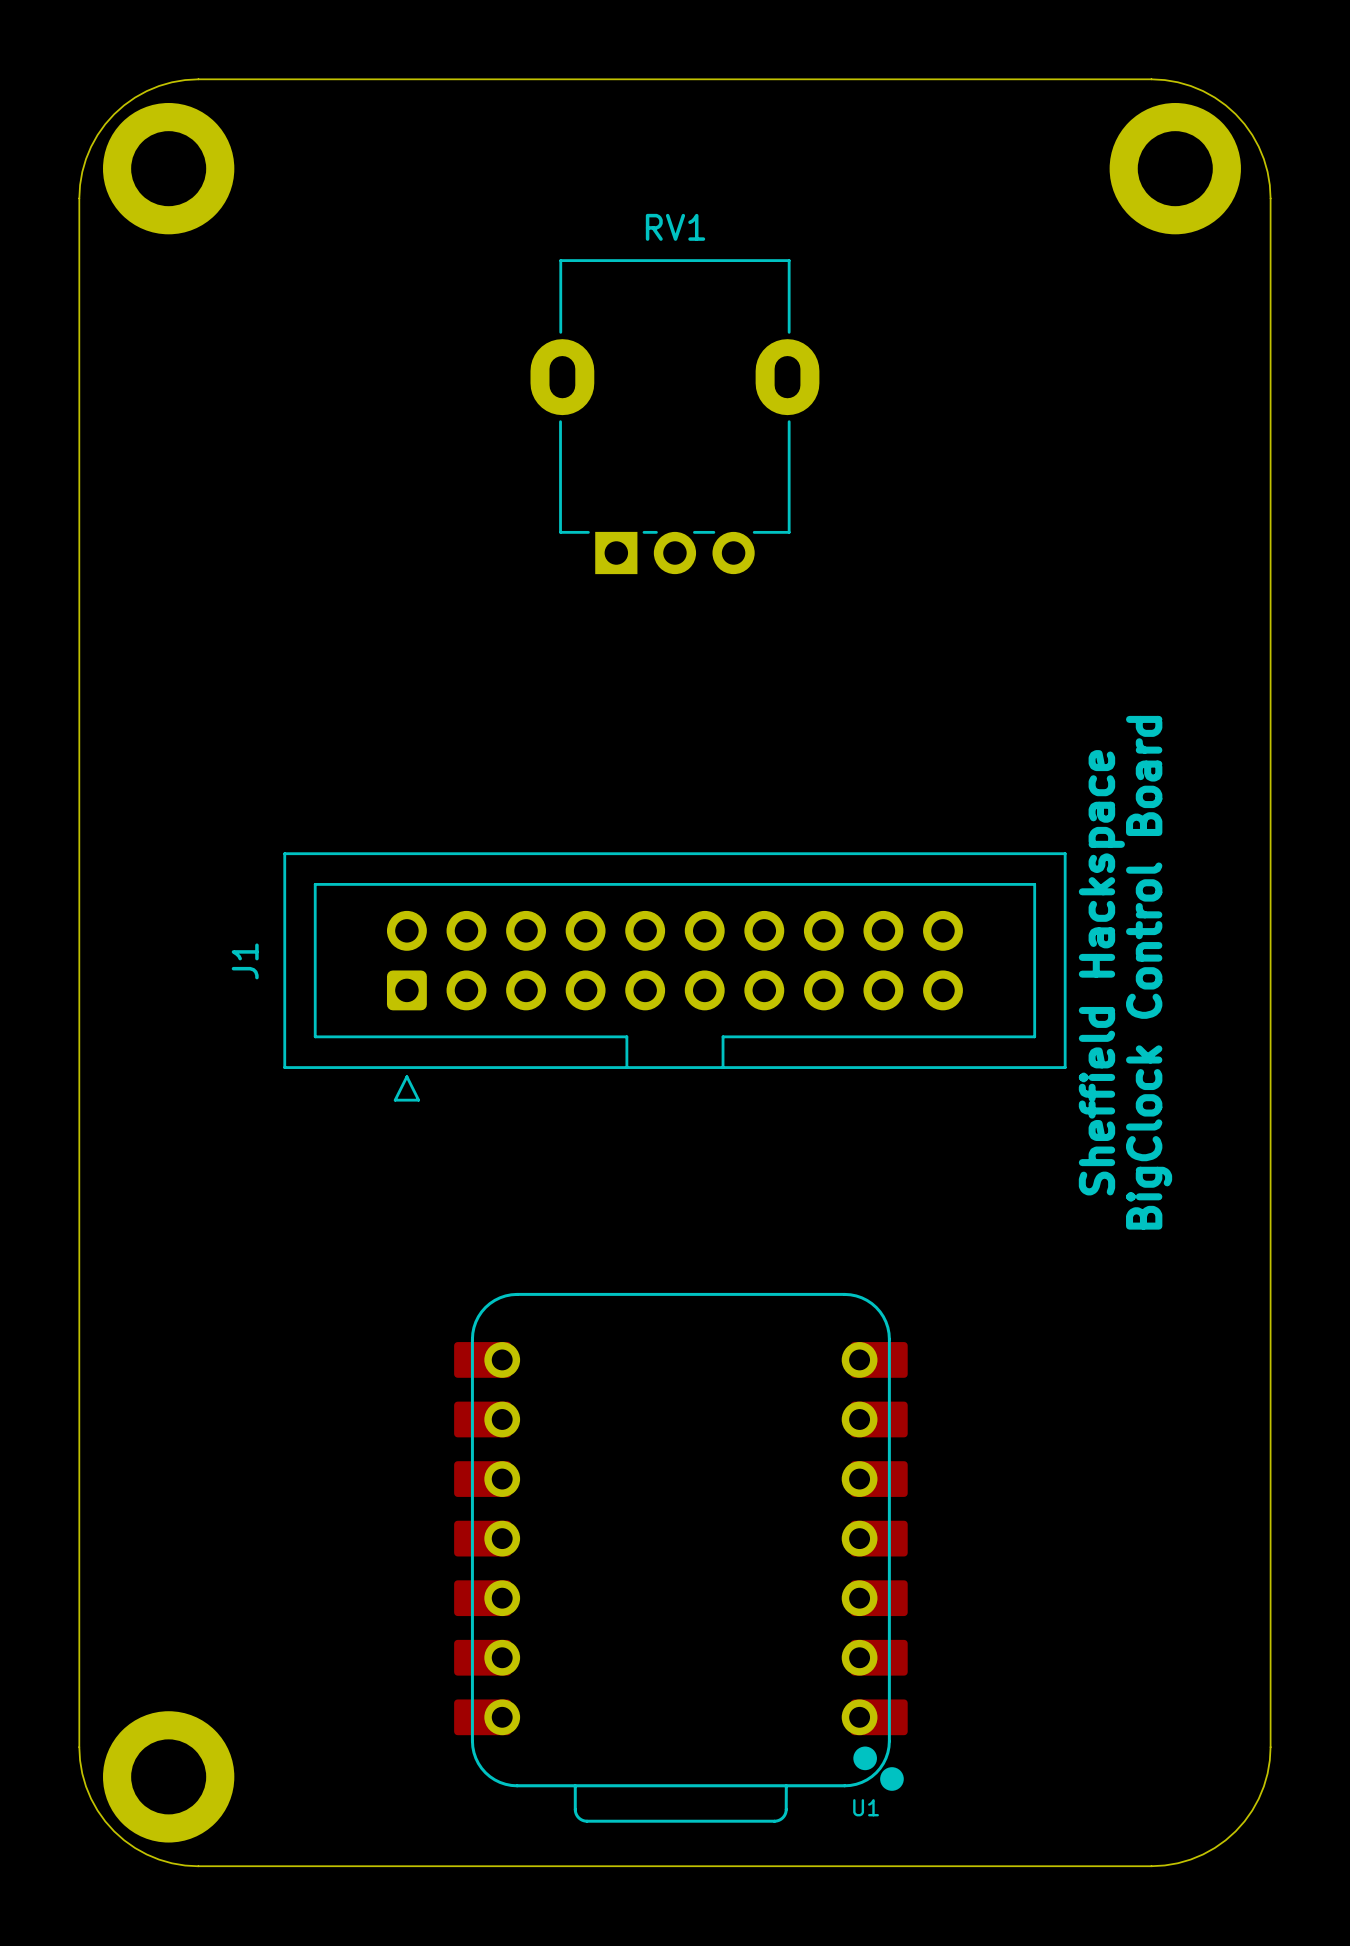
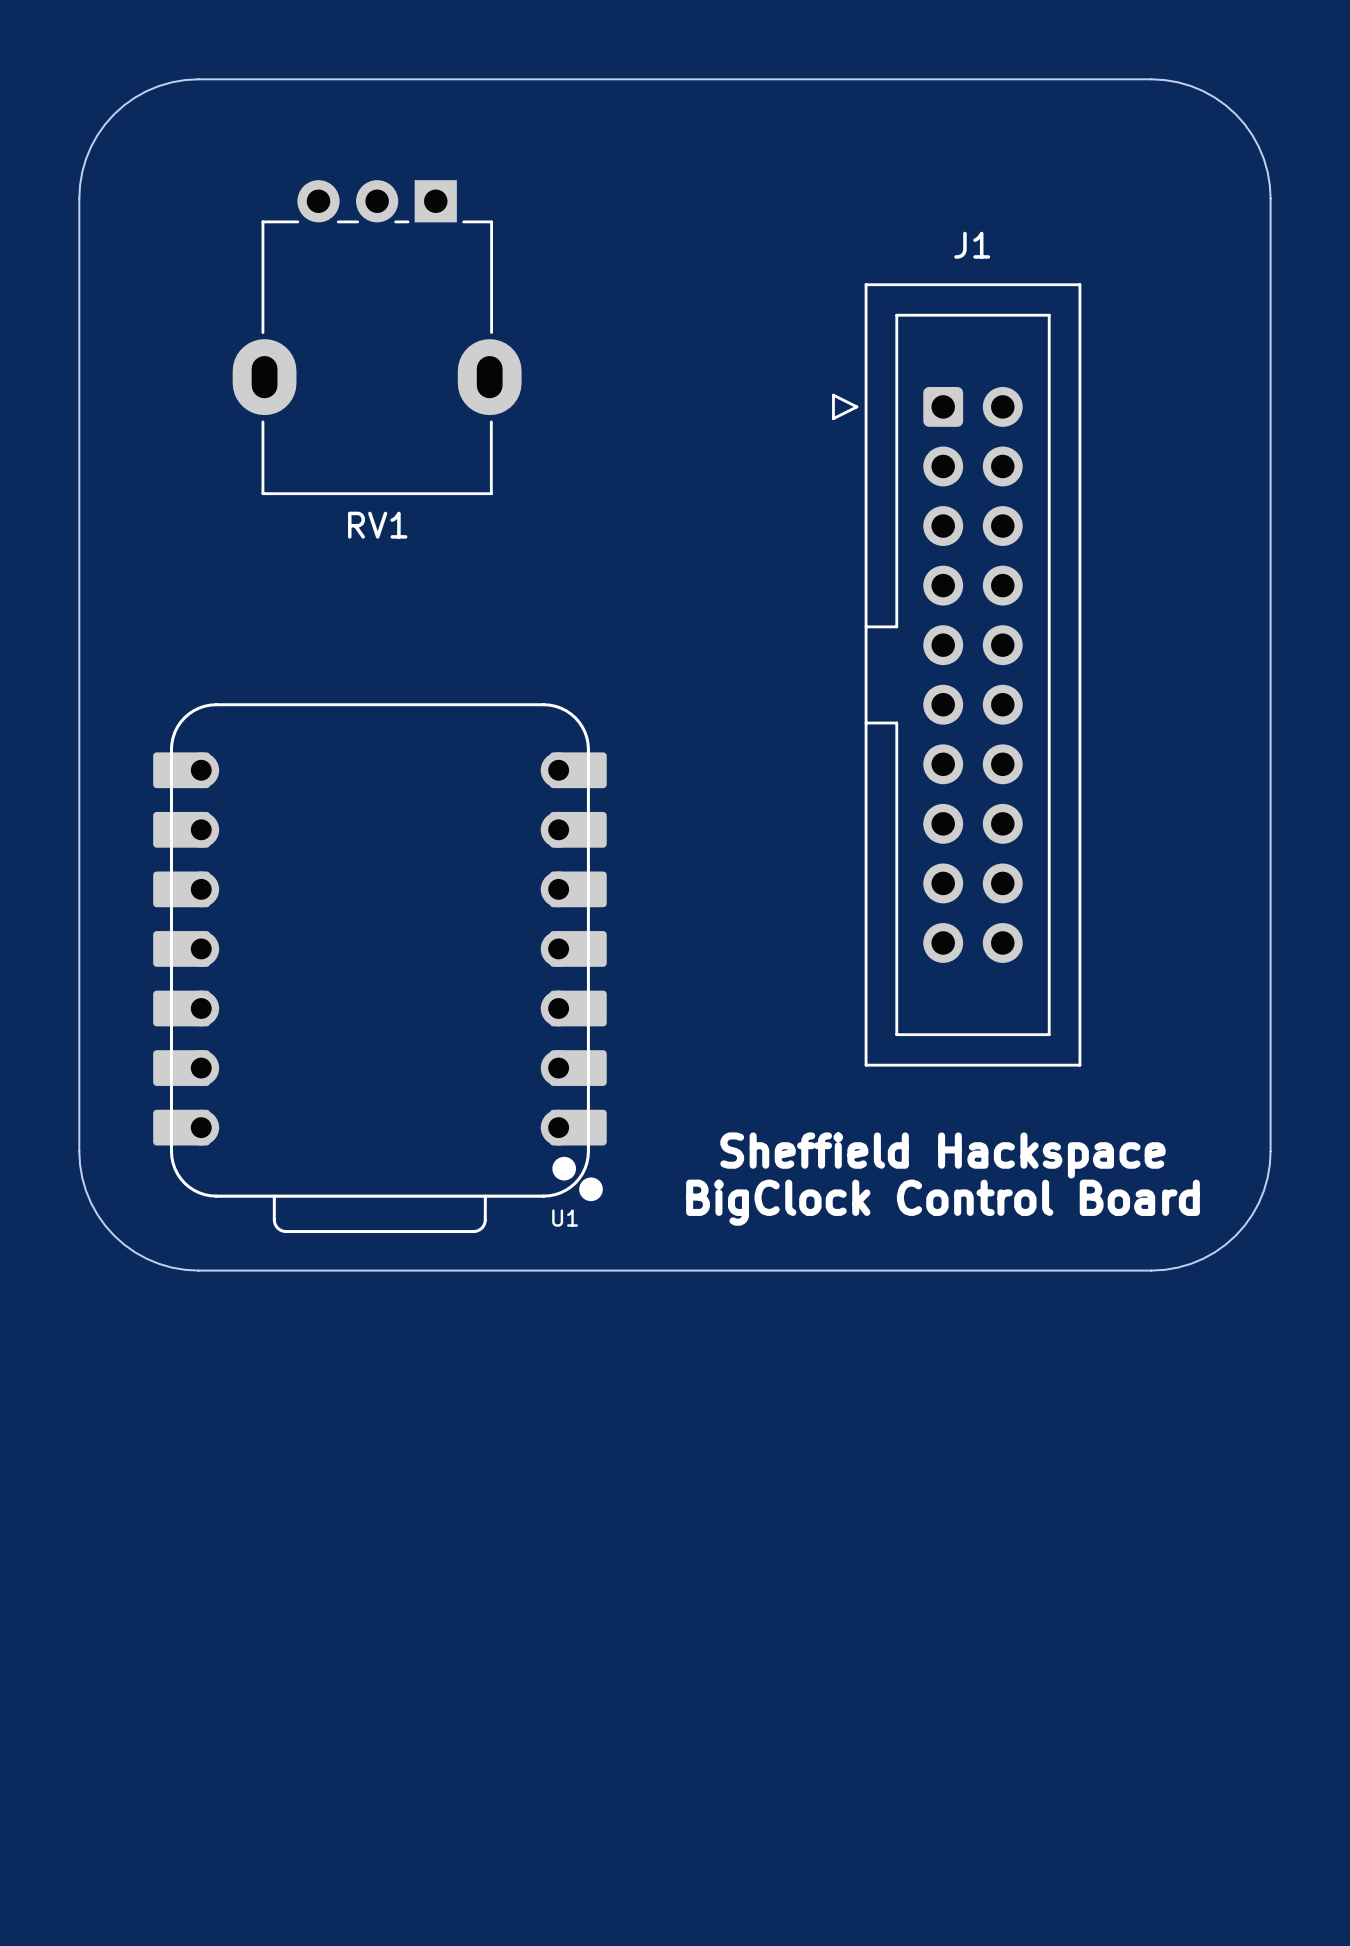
part: (168, 168) -> none
part: (1175, 168) -> none
RV1 rotation: 0° (674, 416) -> 180° (377, 337)
RV1 position: (674, 416) -> (377, 337)
text rotation: 0° (1101, 972) -> 90° clockwise (942, 1155)
text rotation: 0° (1149, 972) -> 90° clockwise (942, 1202)
J1 rotation: 0° (674, 976) -> 90° clockwise (956, 674)
board edge: (79, 1151) (80, 1760) (85, 1786) (97, 1810) (114, 1831) (146, 1854) (171, 1863) (198, 1866) (1164, 1865) (1203, 1854) (1235, 1831) (1252, 1810) (1263, 1786) (1270, 1747) -> (79, 1151) (86, 1190) (97, 1214) (114, 1235) (135, 1252) (159, 1263) (198, 1270) (1164, 1269) (1190, 1263) (1214, 1252) (1244, 1225) (1263, 1190) (1270, 1151)
board edge: (1270, 1151) (1270, 1747) -> none
U1 position: (680, 1557) -> (379, 968)
part: (168, 1776) -> none

